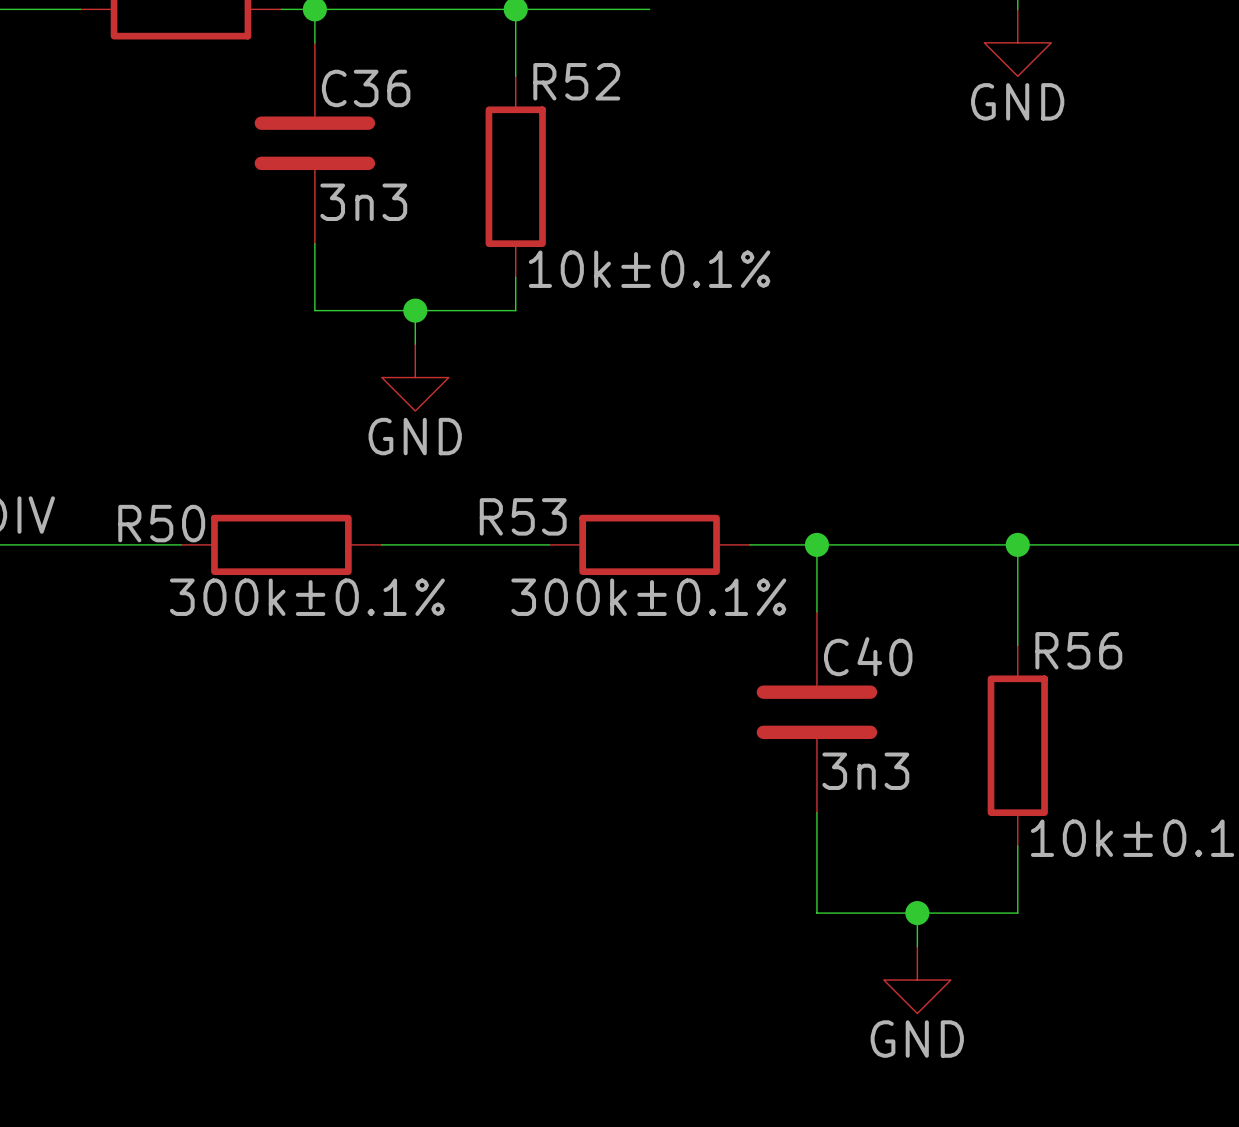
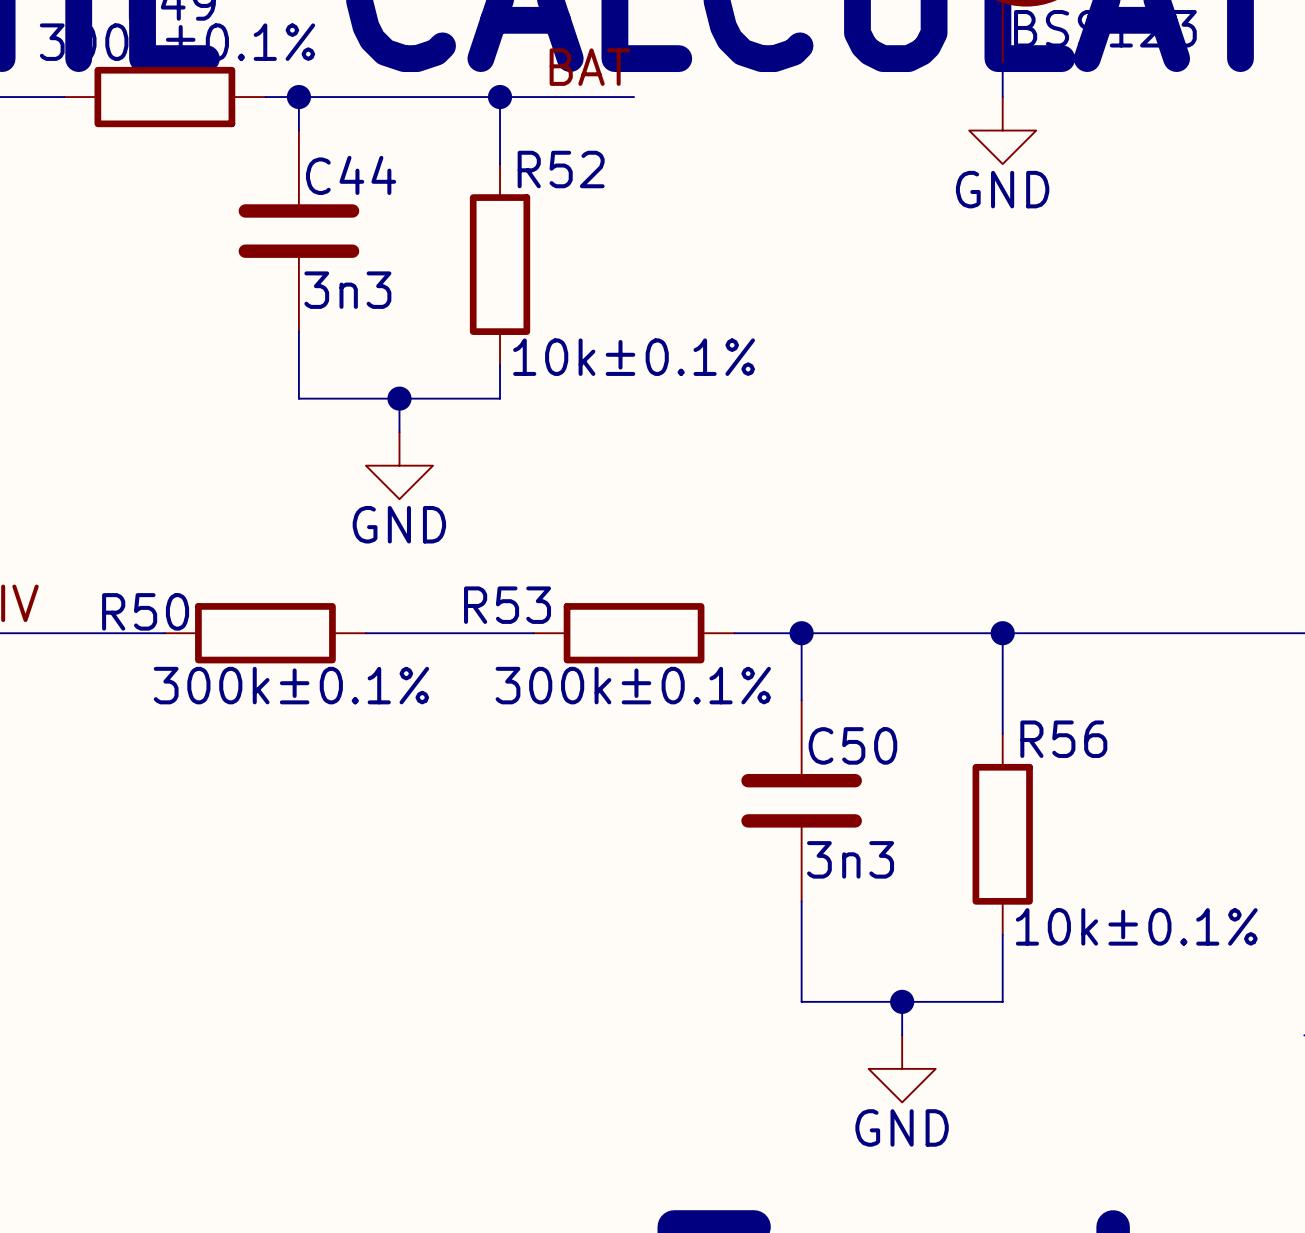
C36 name: C36 (366, 88) -> C44 (351, 175)
C40 name: C40 (868, 656) -> C50 (852, 745)

